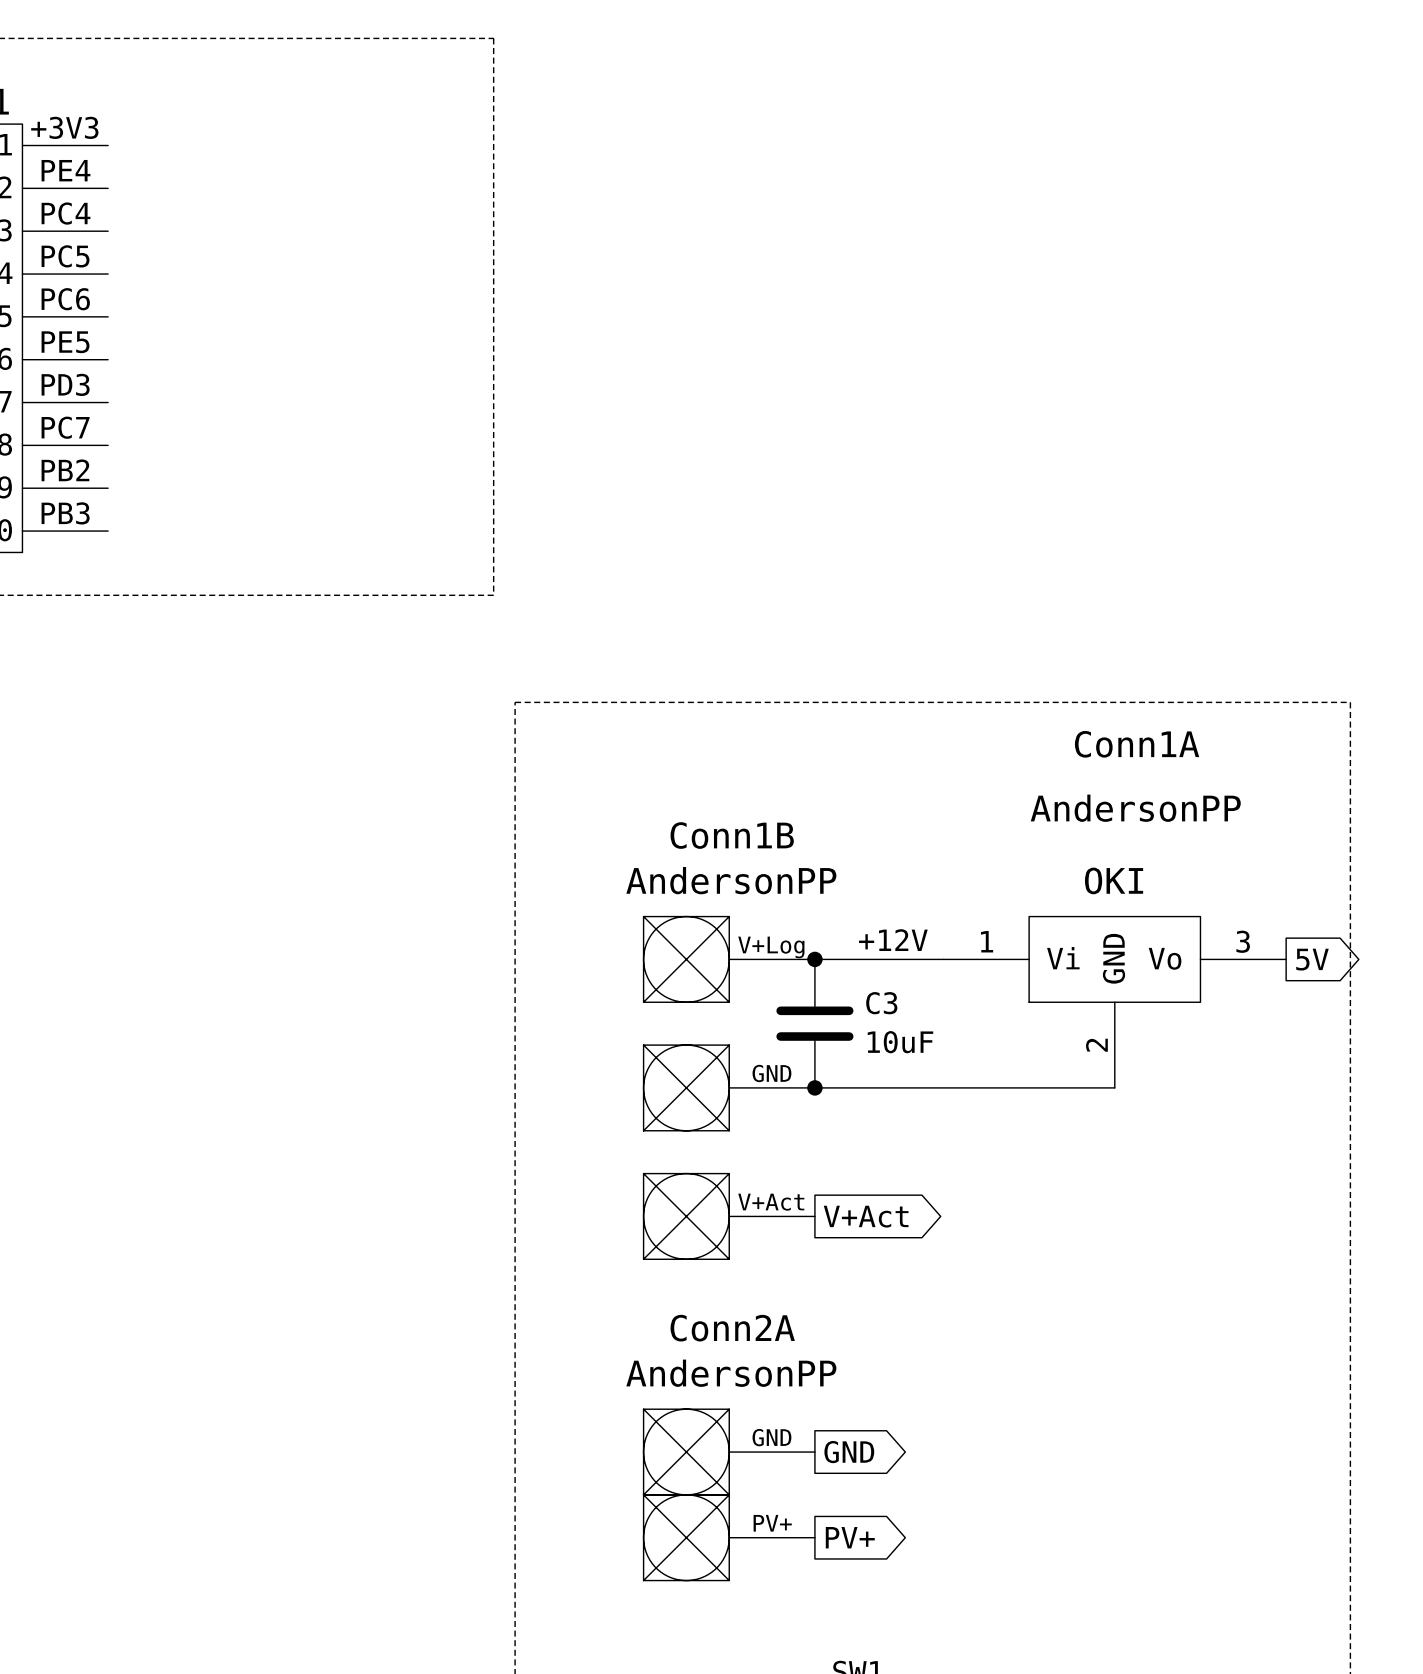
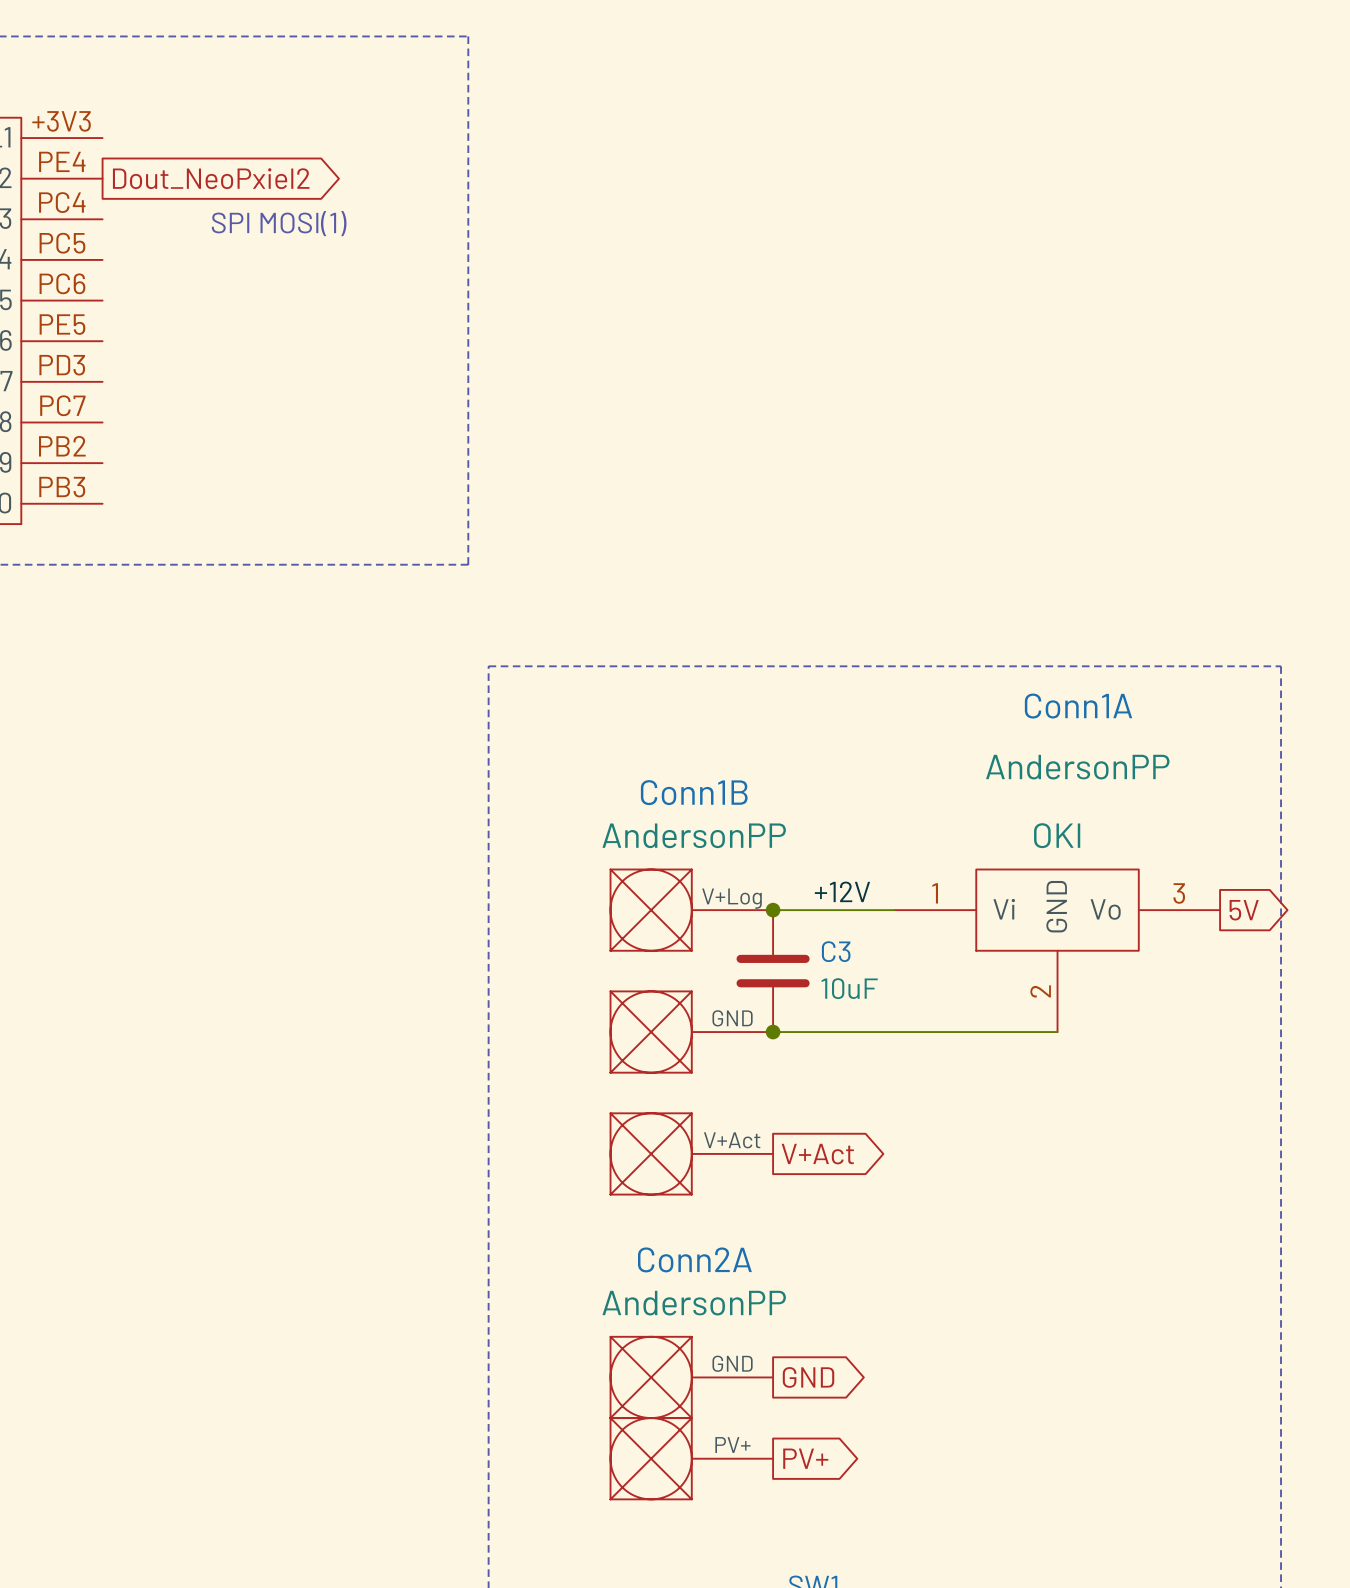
global label: none -> Dout_NeoPxiel2 (211, 178)
text: none -> SPI MOSI(1) (279, 223)

